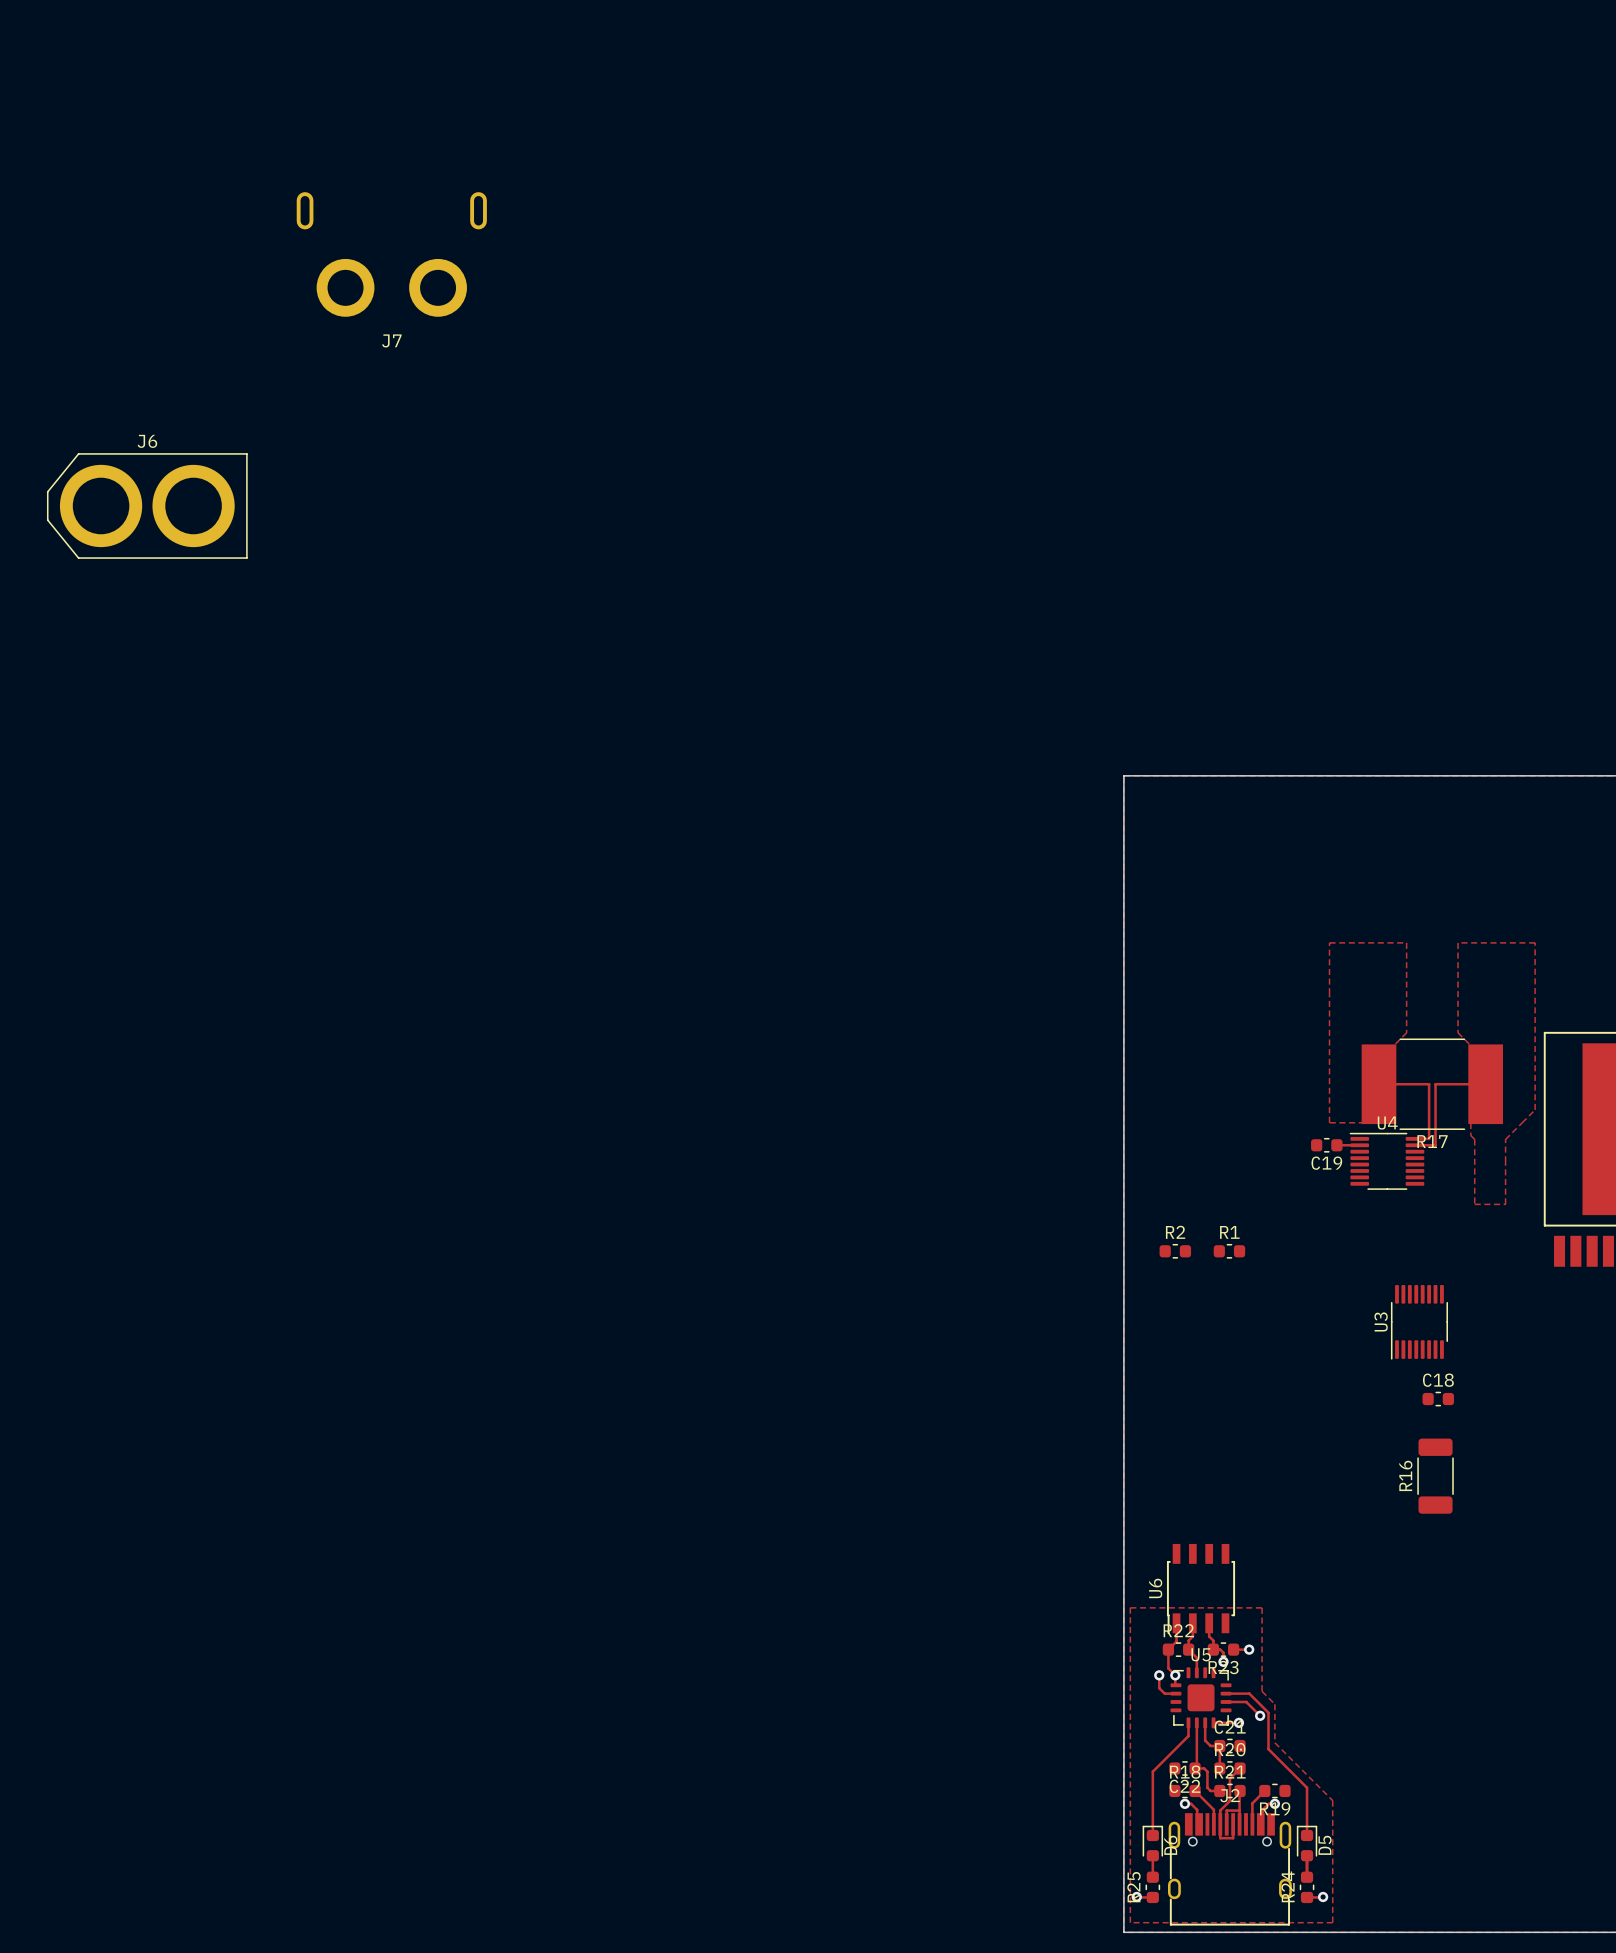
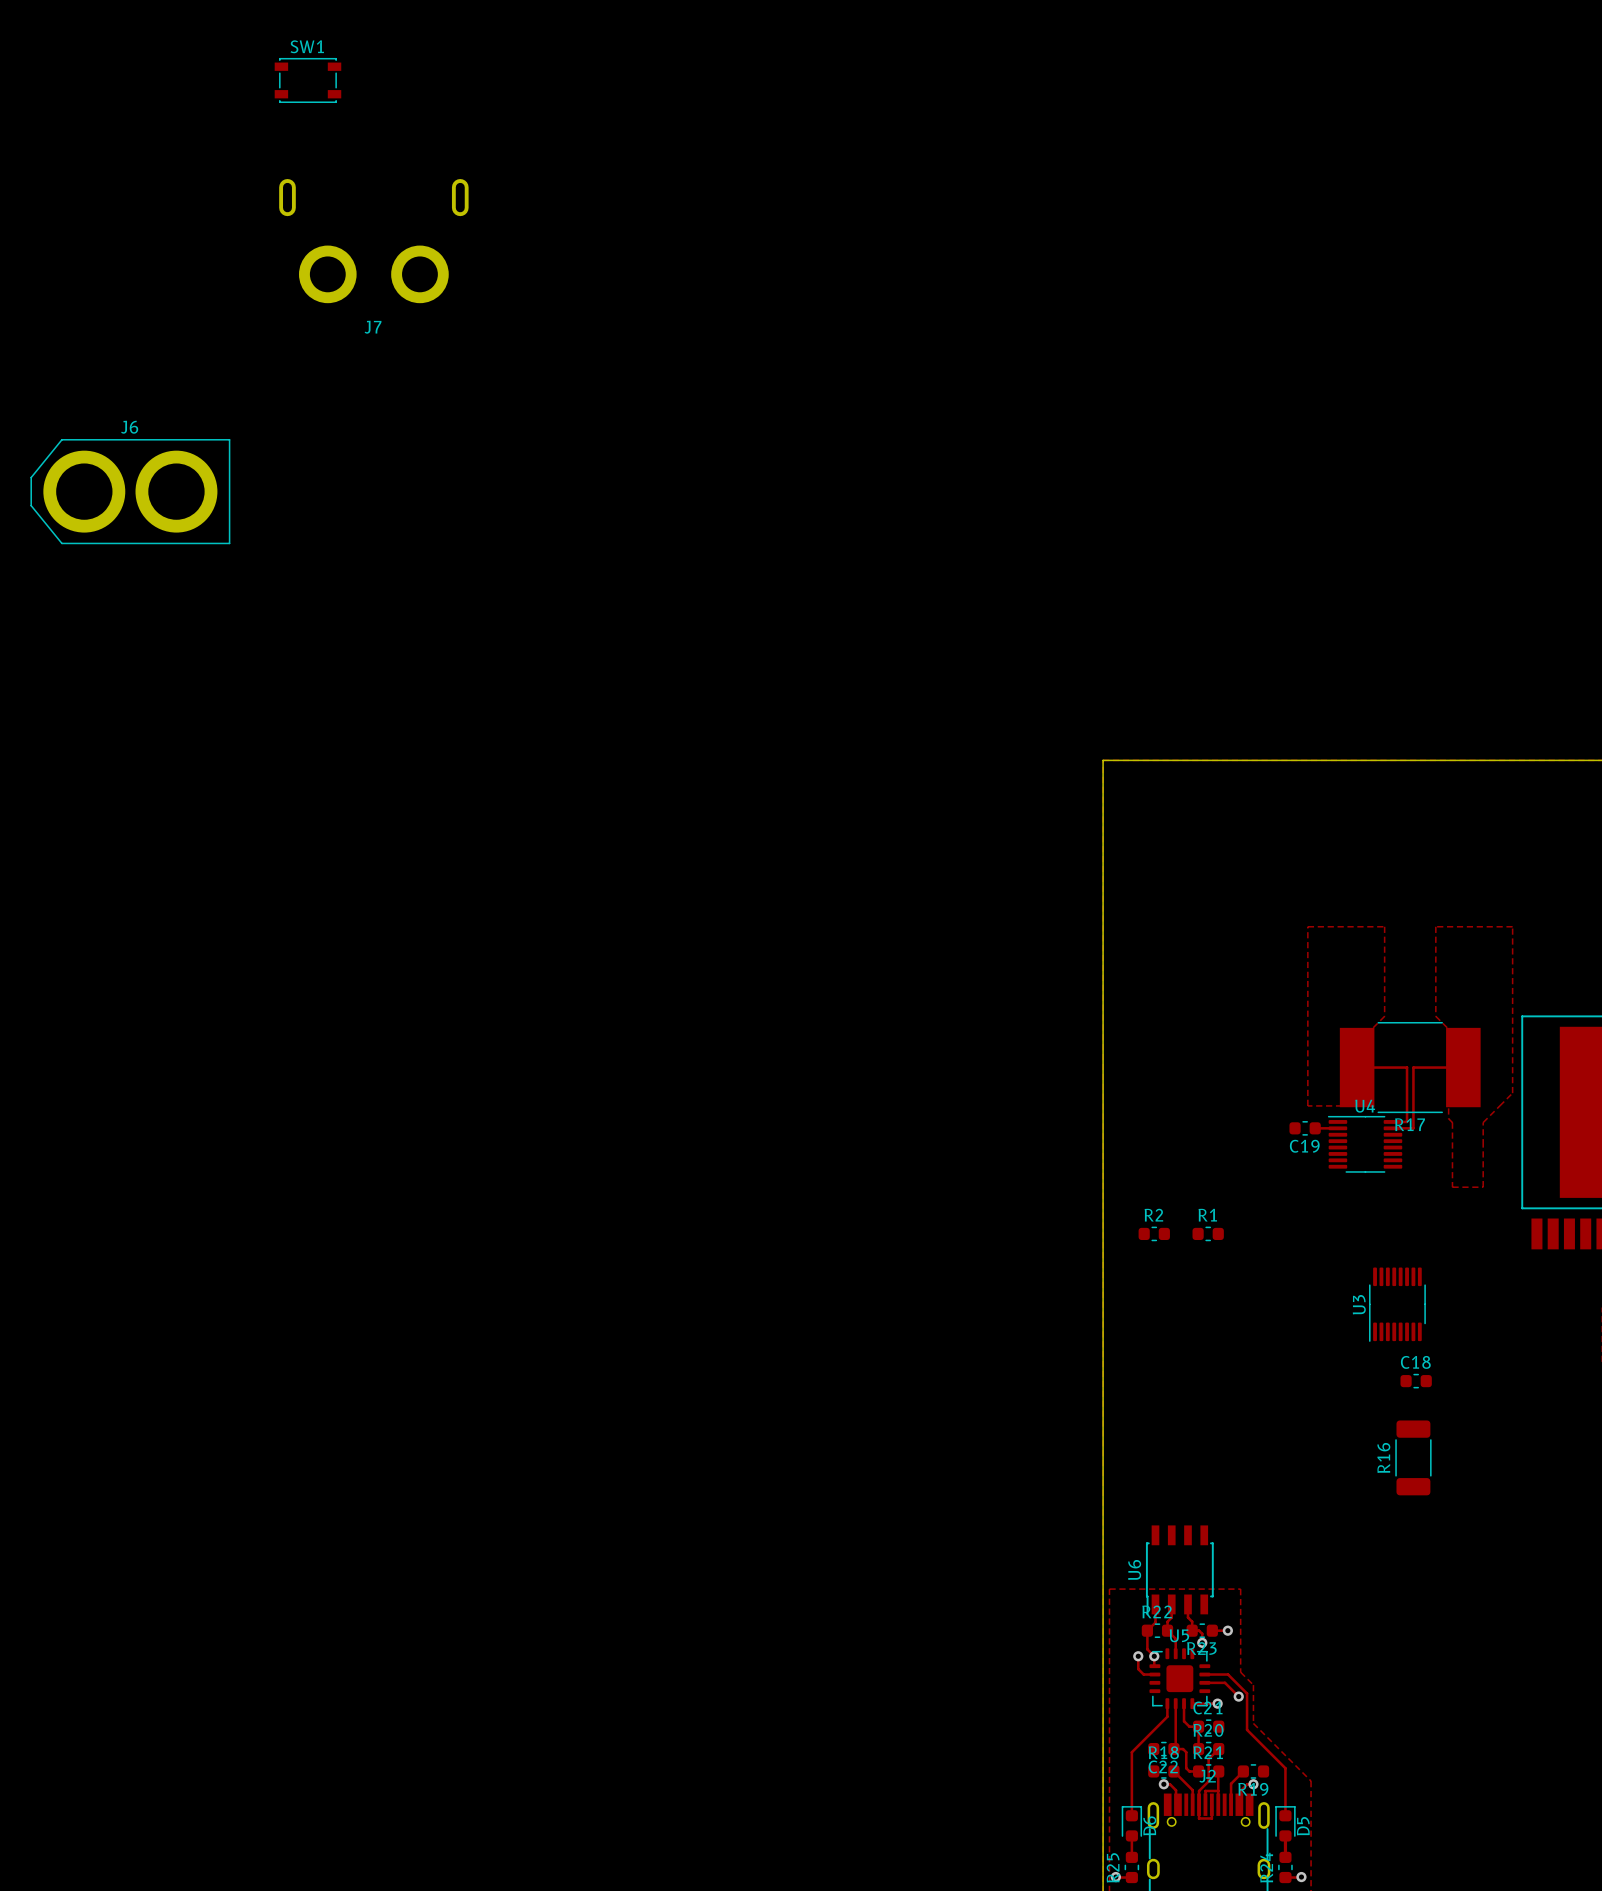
SW1: none -> (307, 80)

